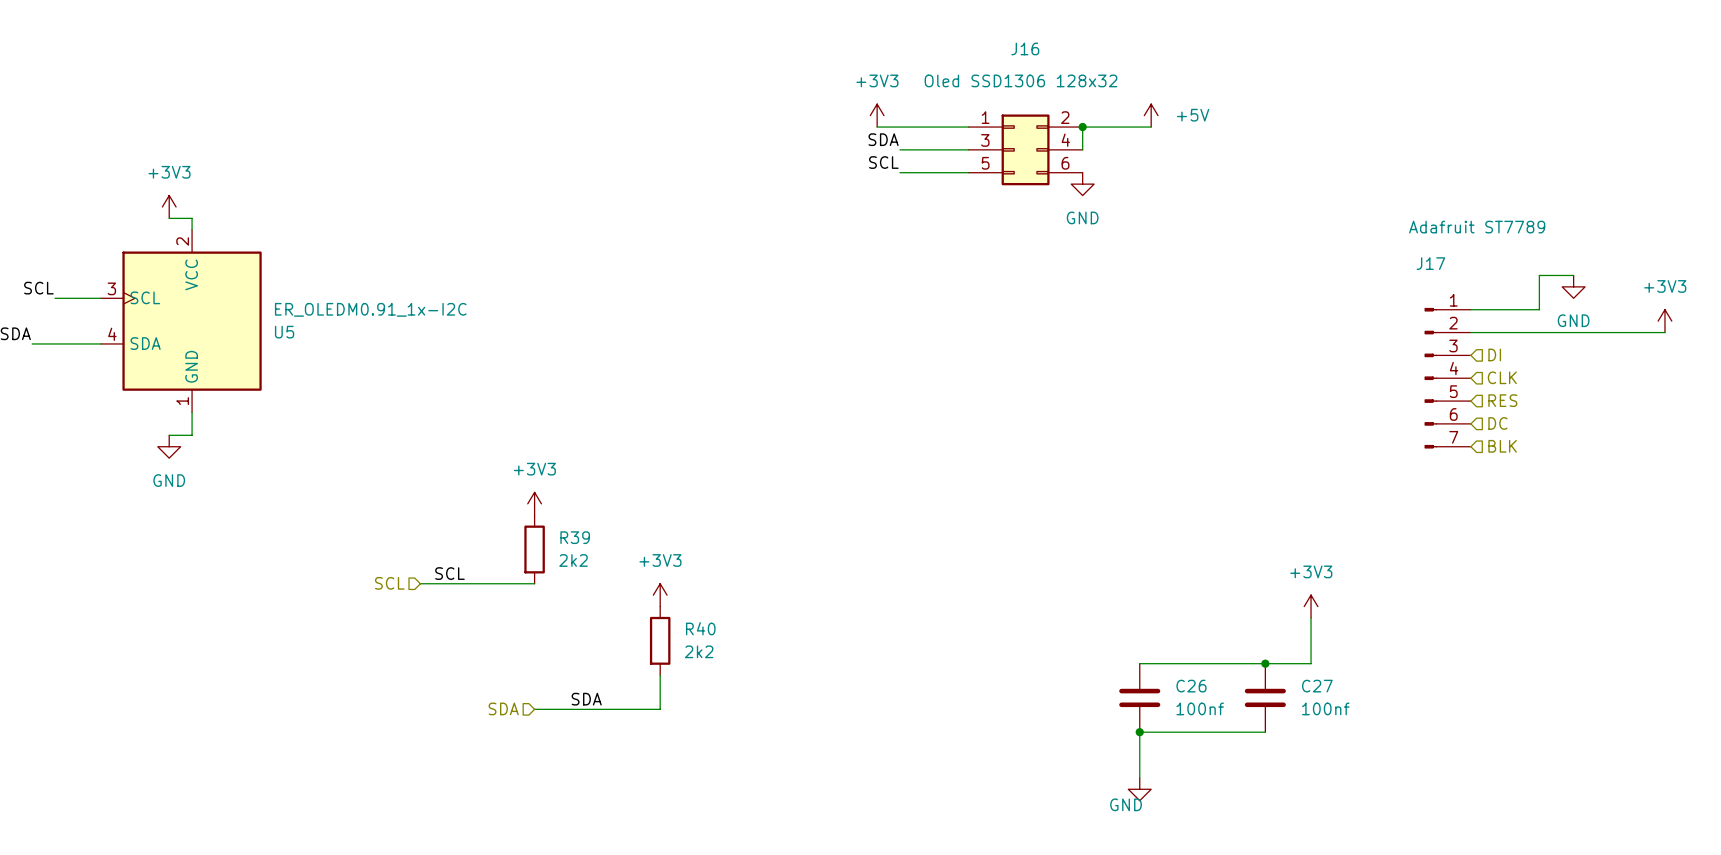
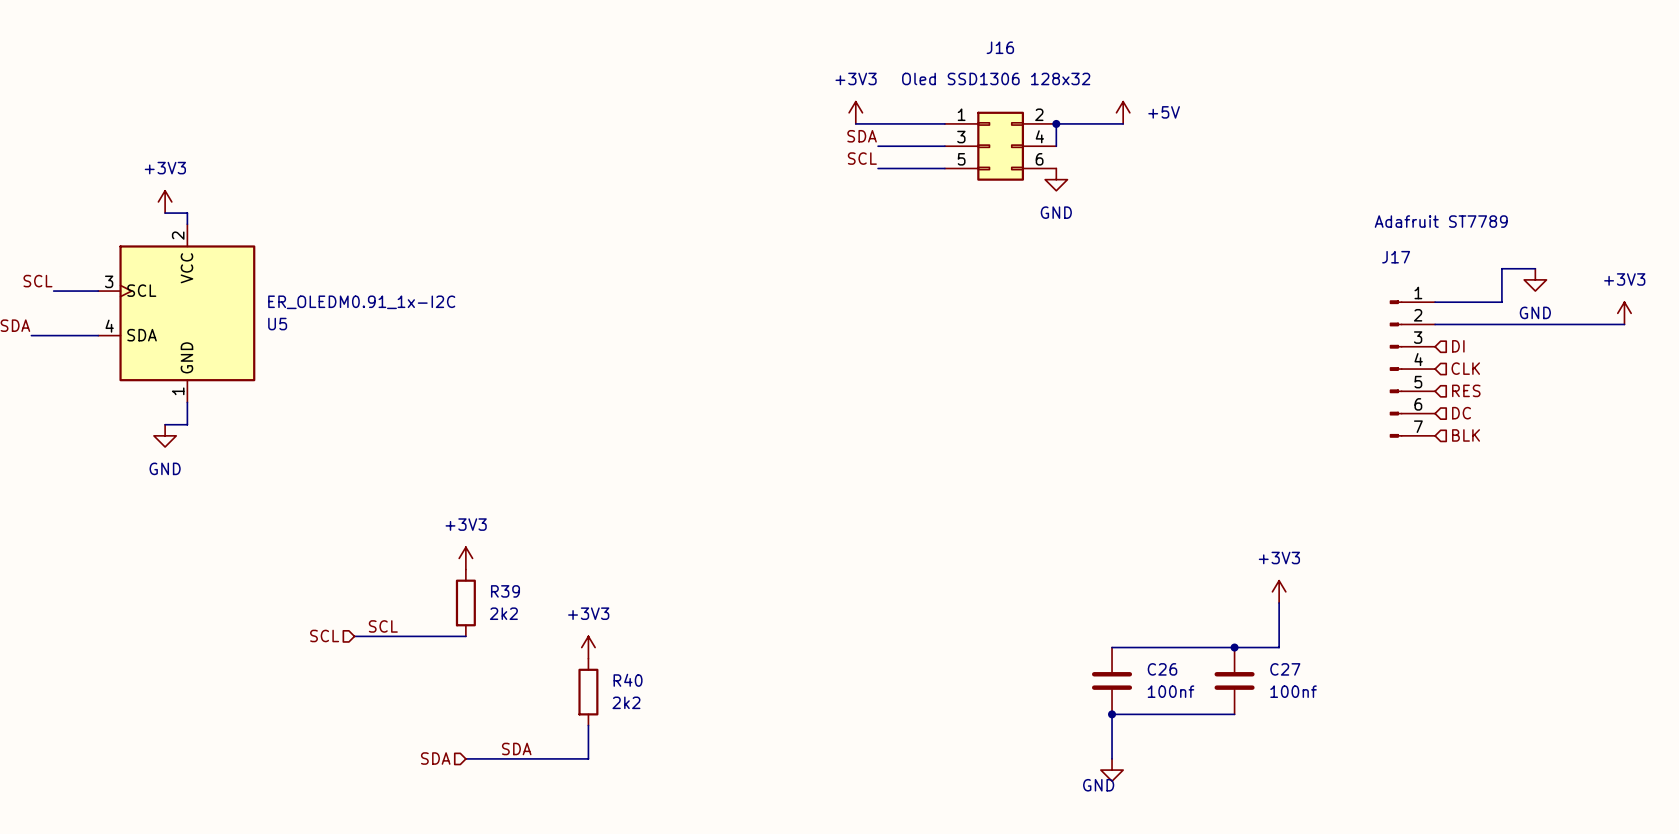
power symbol: +3V3 (534, 503) -> none
R39 position: (534, 549) -> (465, 602)
power symbol: none -> +3V3 (465, 558)
label position: SCL (449, 573) -> SCL (383, 626)
hierarchical label position: SCL (389, 583) -> SCL (324, 635)
wire: (420, 583) (534, 583) -> (354, 636) (465, 636)
power symbol: +3V3 (660, 595) -> none
R40 position: (660, 640) -> (588, 692)
power symbol: none -> +3V3 (588, 647)
wire: (660, 675) (660, 709) (534, 709) -> (588, 725) (588, 758) (465, 758)
label position: SDA (586, 699) -> SDA (516, 748)
hierarchical label position: SDA (503, 708) -> SDA (435, 758)

